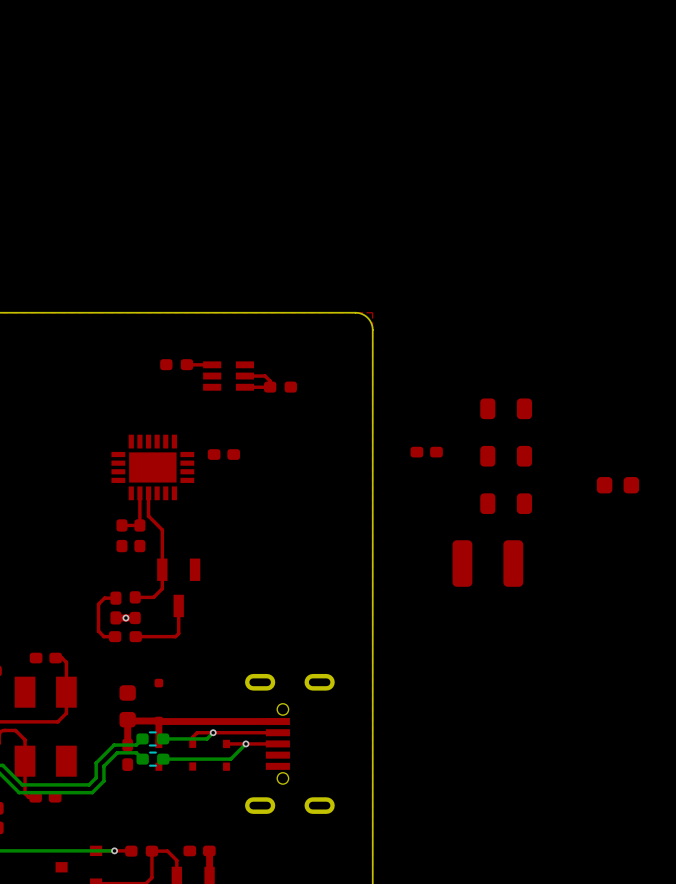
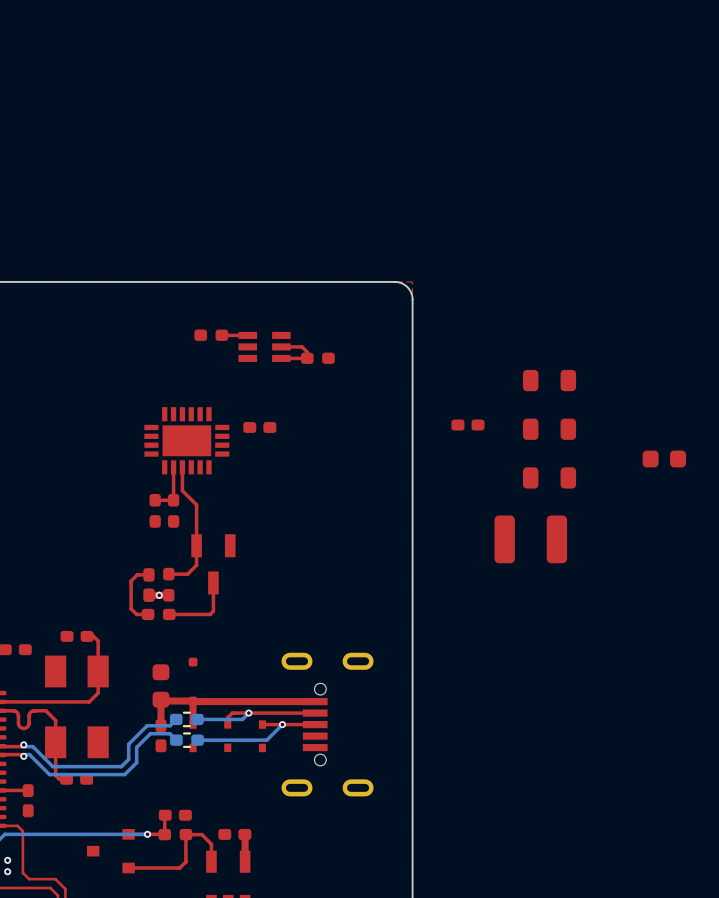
top track: none -> (164, 815) (164, 834)
part: none -> (175, 815)

